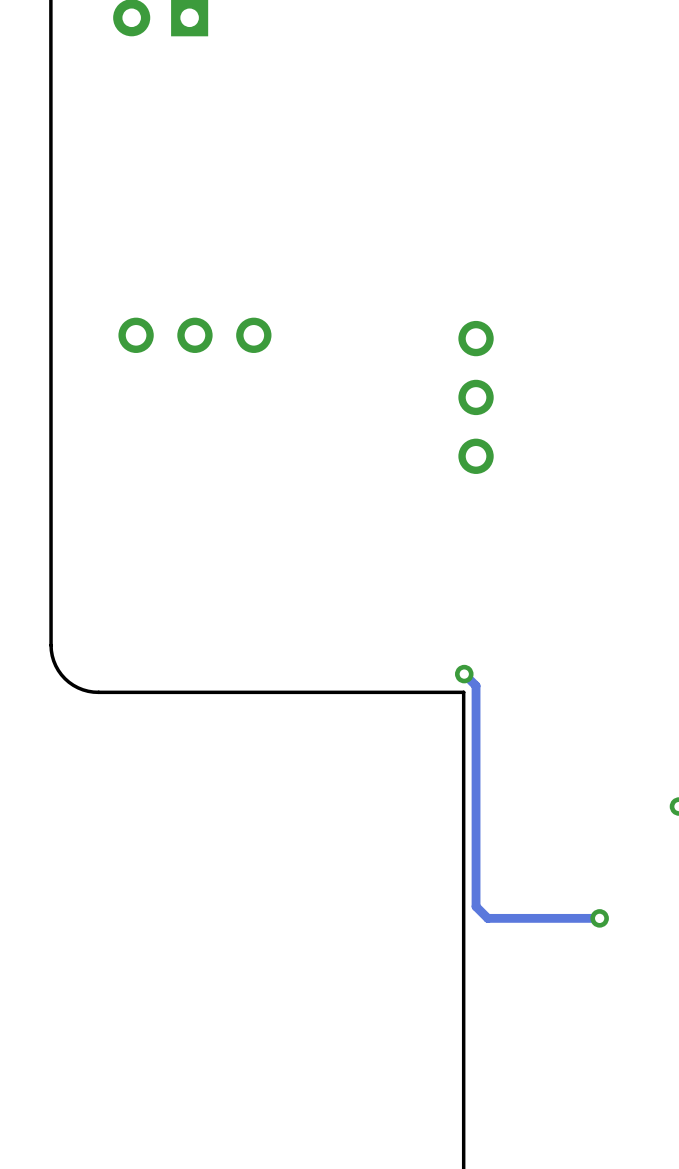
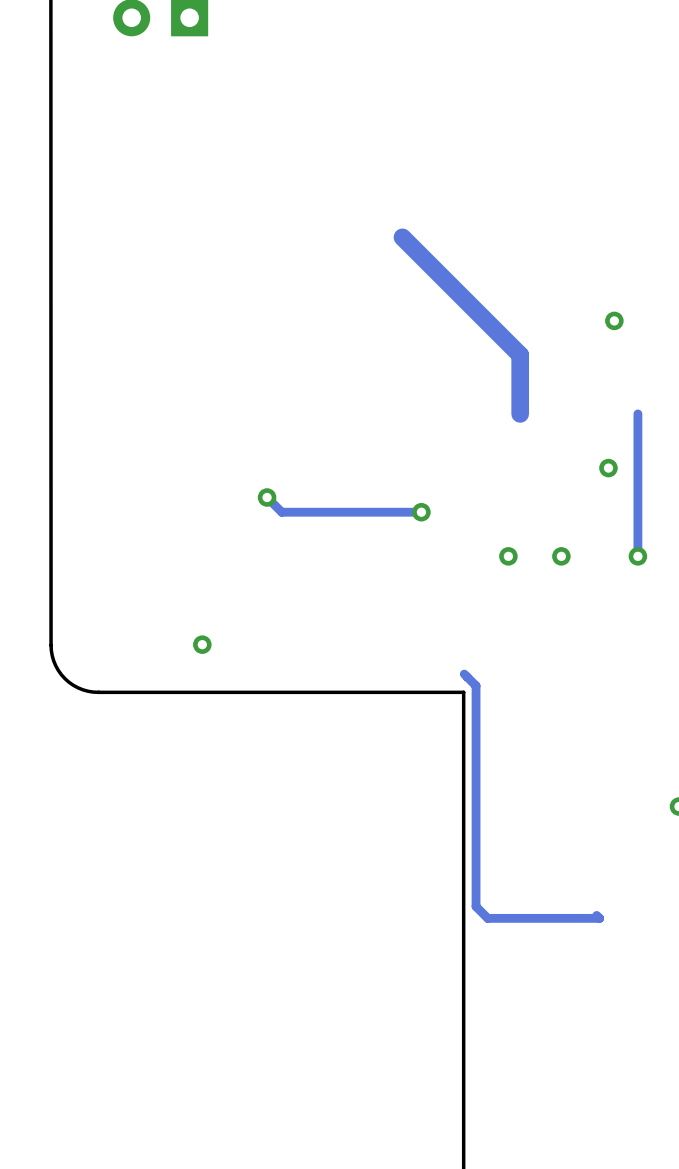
track: none -> (402, 237) (520, 355) (520, 413)
via: none -> (614, 320)
part: (194, 335) -> none
part: (476, 397) -> none
track: none -> (637, 413) (637, 556)
via: none -> (608, 468)
track: none -> (267, 497) (281, 512) (421, 512)
via: none -> (267, 497)
via: none -> (421, 512)
via: none -> (508, 556)
via: none -> (561, 556)
via: none -> (637, 556)
via: none -> (202, 644)
via: (464, 674) -> none
via: (599, 918) -> none

